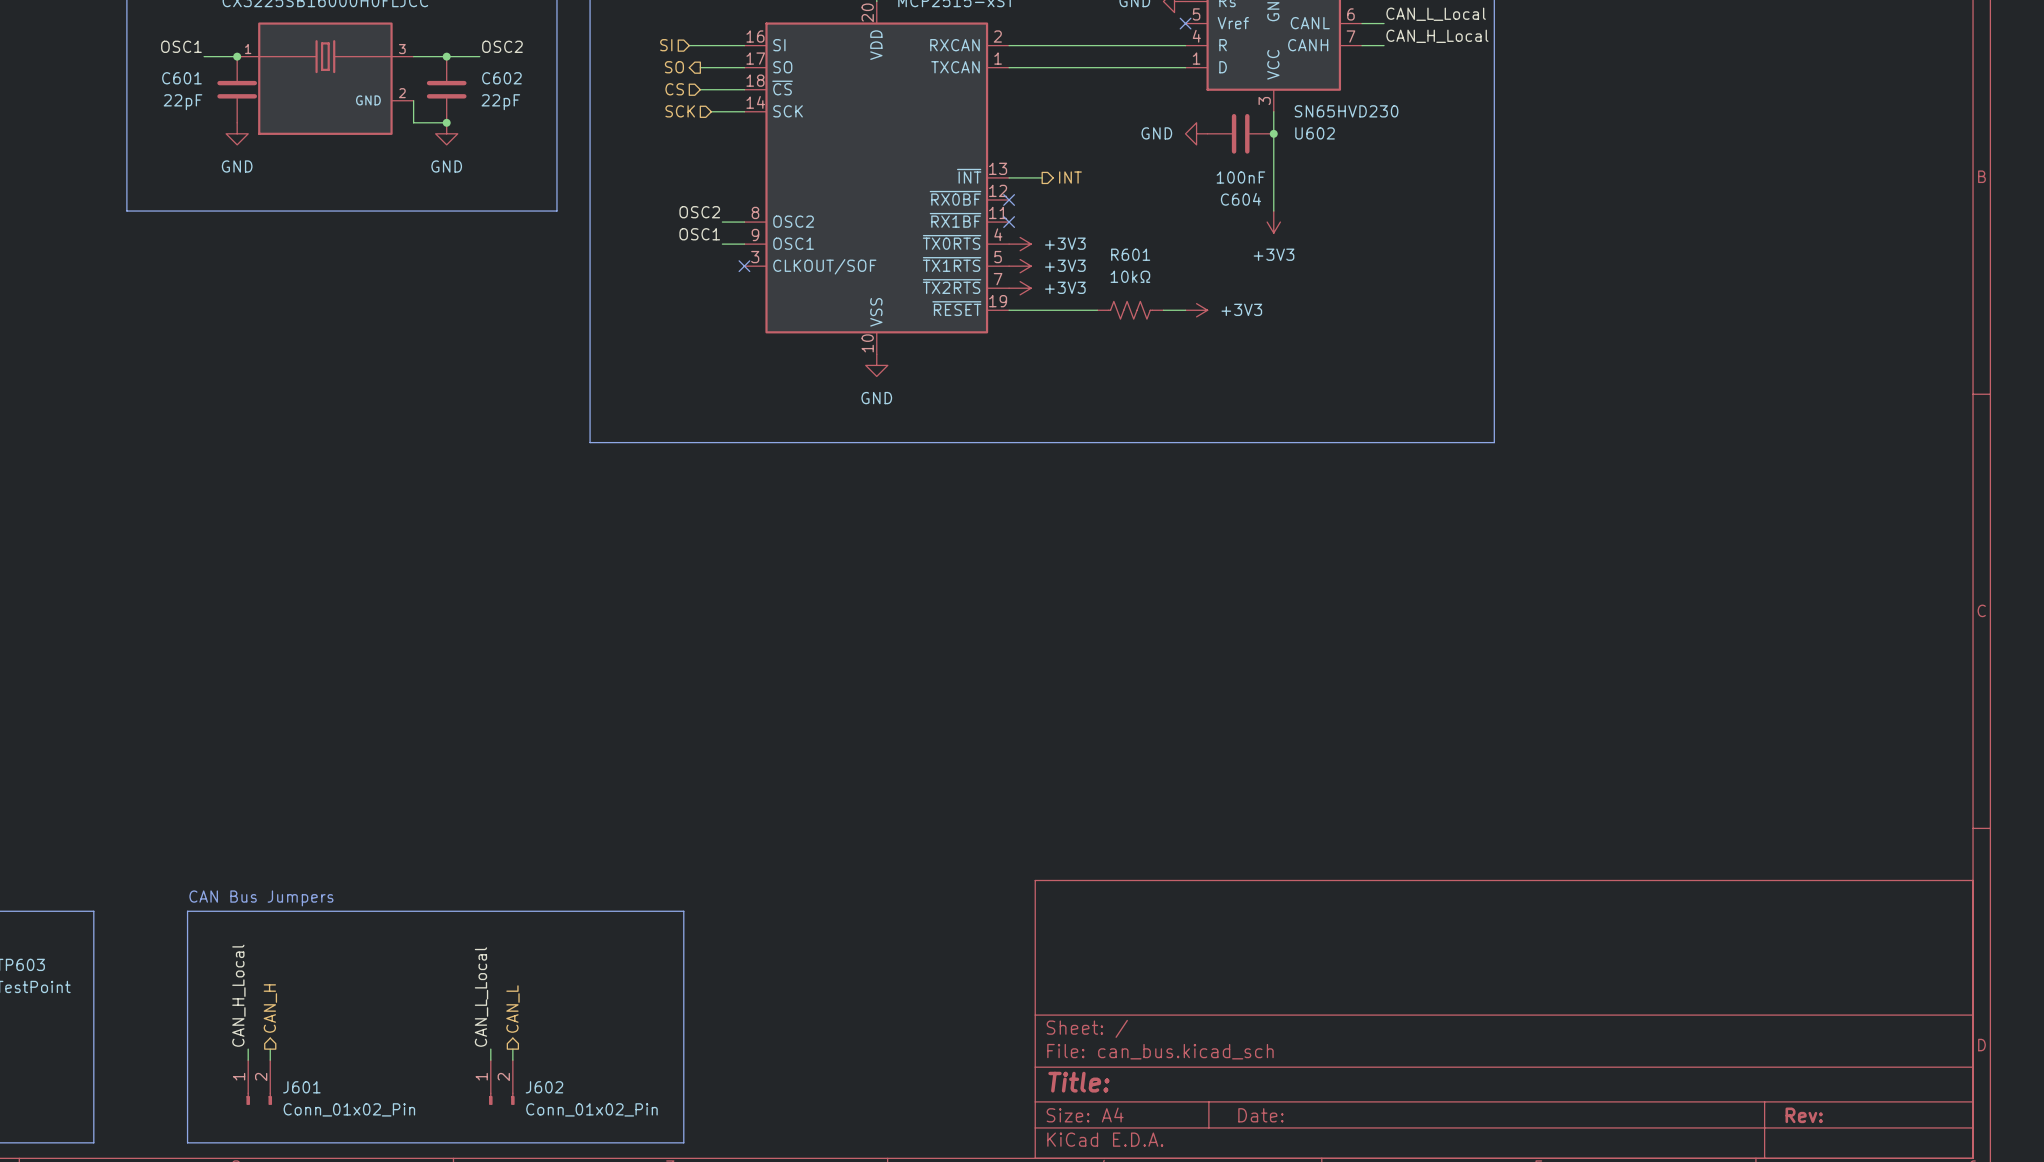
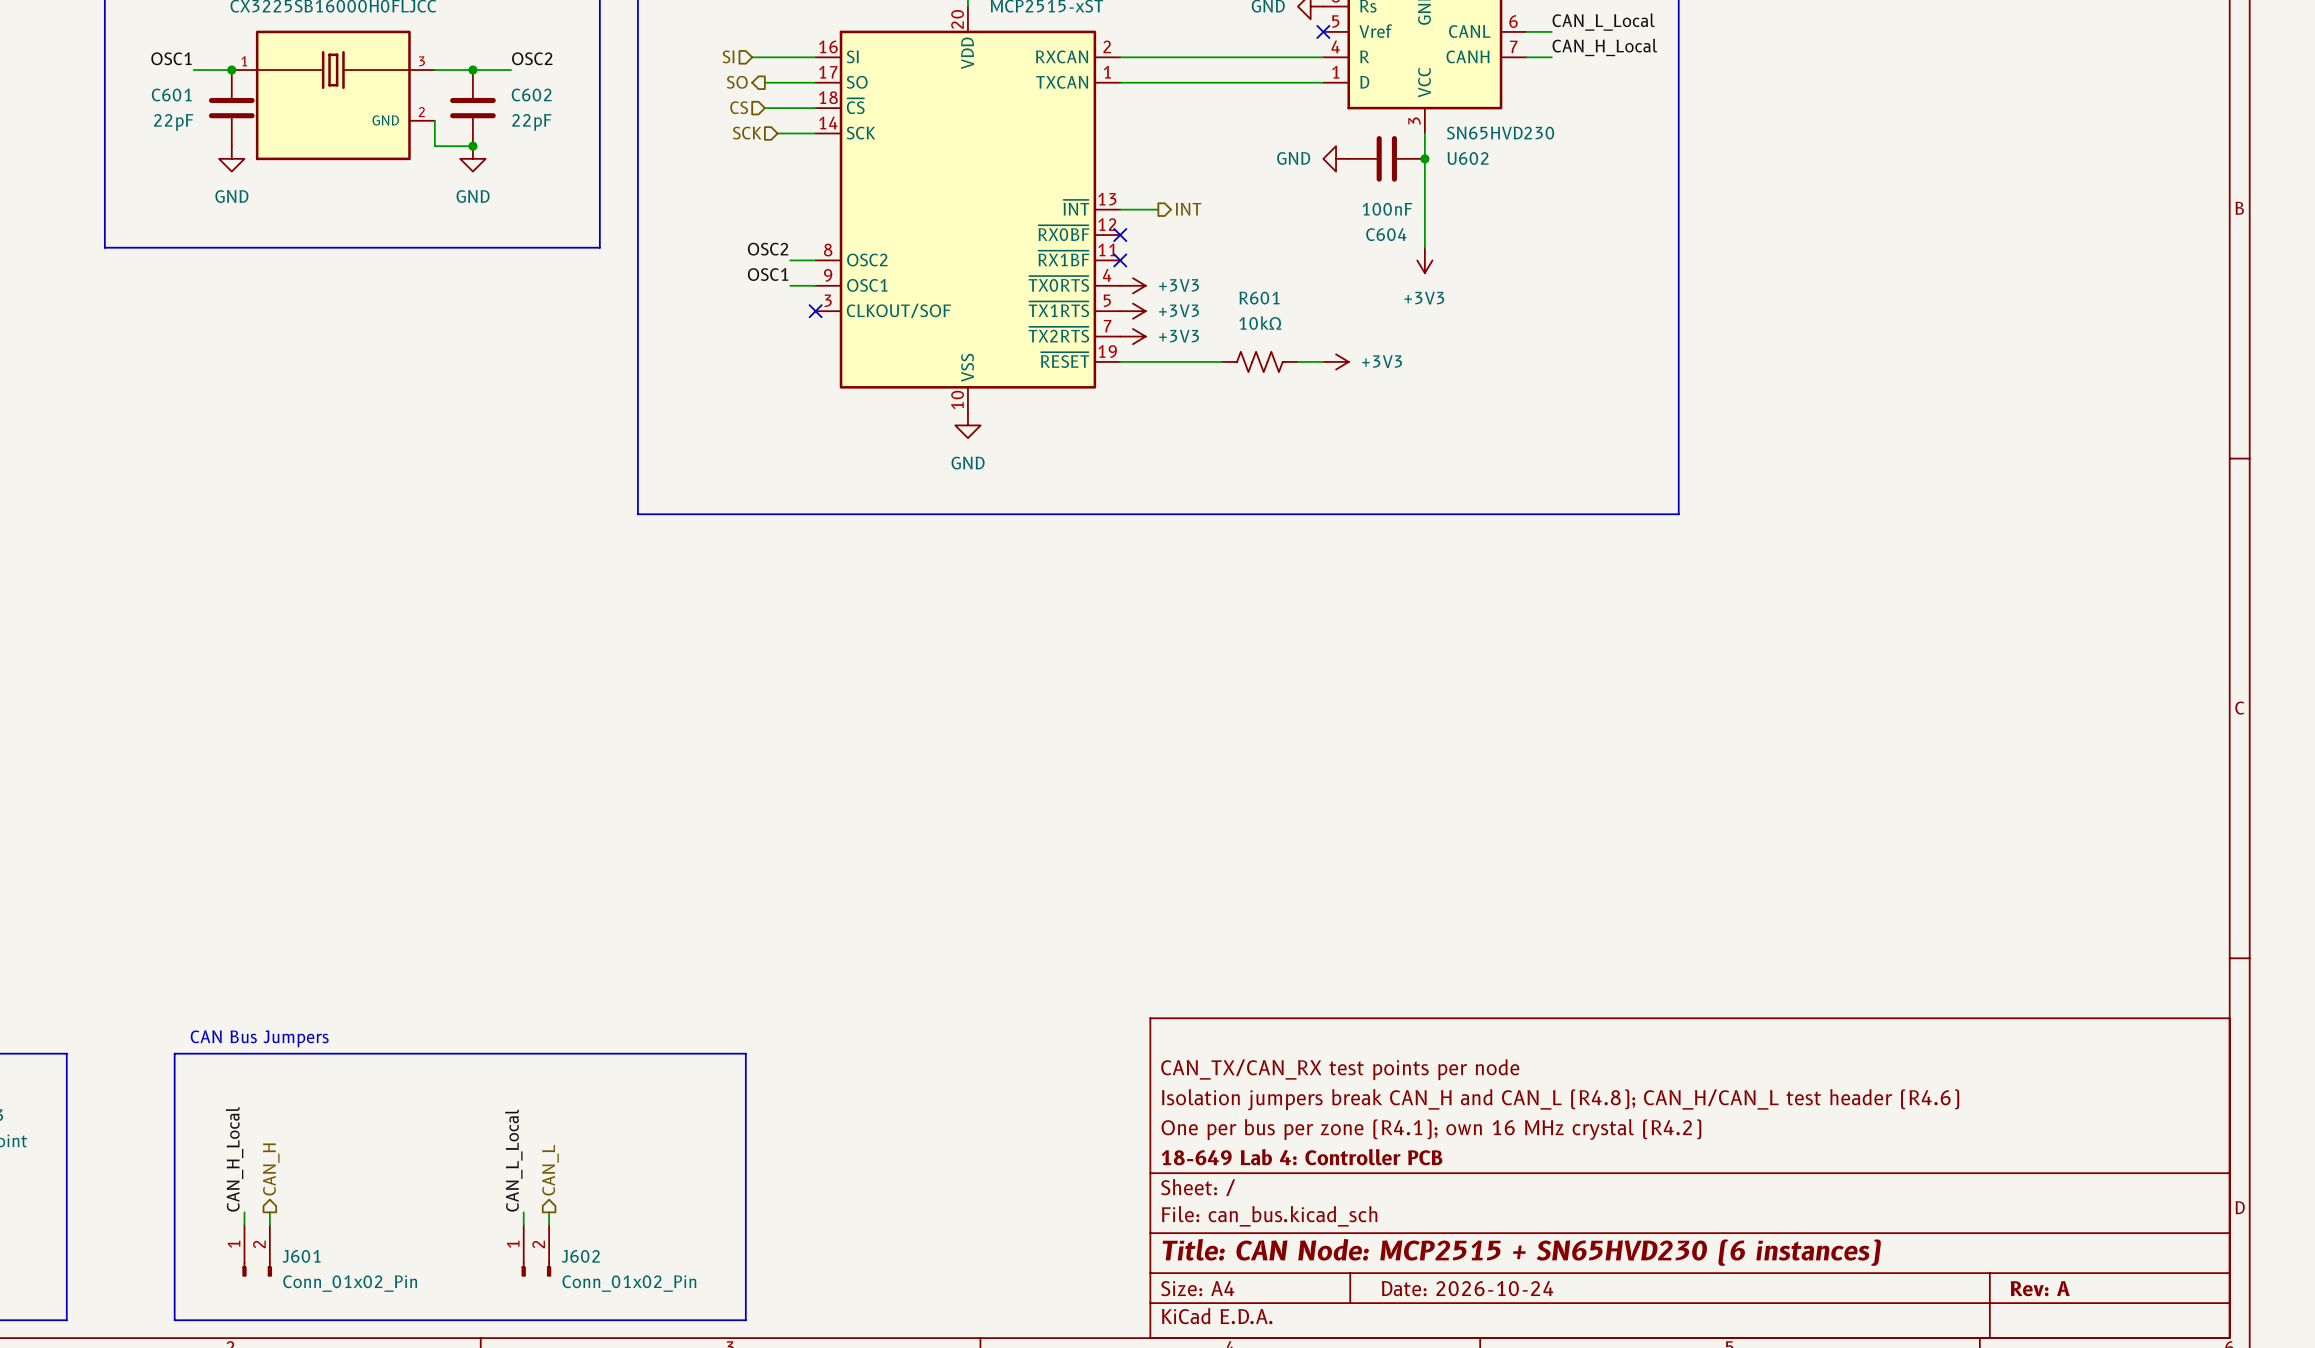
title block: none -> CAN_TX/CAN_RX test points per node (1340, 1069)
title block: none -> Isolation jumpers break CAN_H and CAN_L (R4.8); CAN_H/CAN_L test header (R4.6) (1560, 1099)
title block: none -> One per bus per zone (R4.1); own 16 MHz crystal (R4.2) (1431, 1129)
title block: none -> 18-649 Lab 4: Controller PCB (1302, 1157)
title block: Title: (1078, 1082) -> Title: CAN Node: MCP2515 + SN65HVD230 (6 instances) (1521, 1252)
title block: Date: (1260, 1115) -> Date: 2026-10-24 (1467, 1288)
title block: Rev: (1804, 1115) -> Rev: A (2040, 1288)

